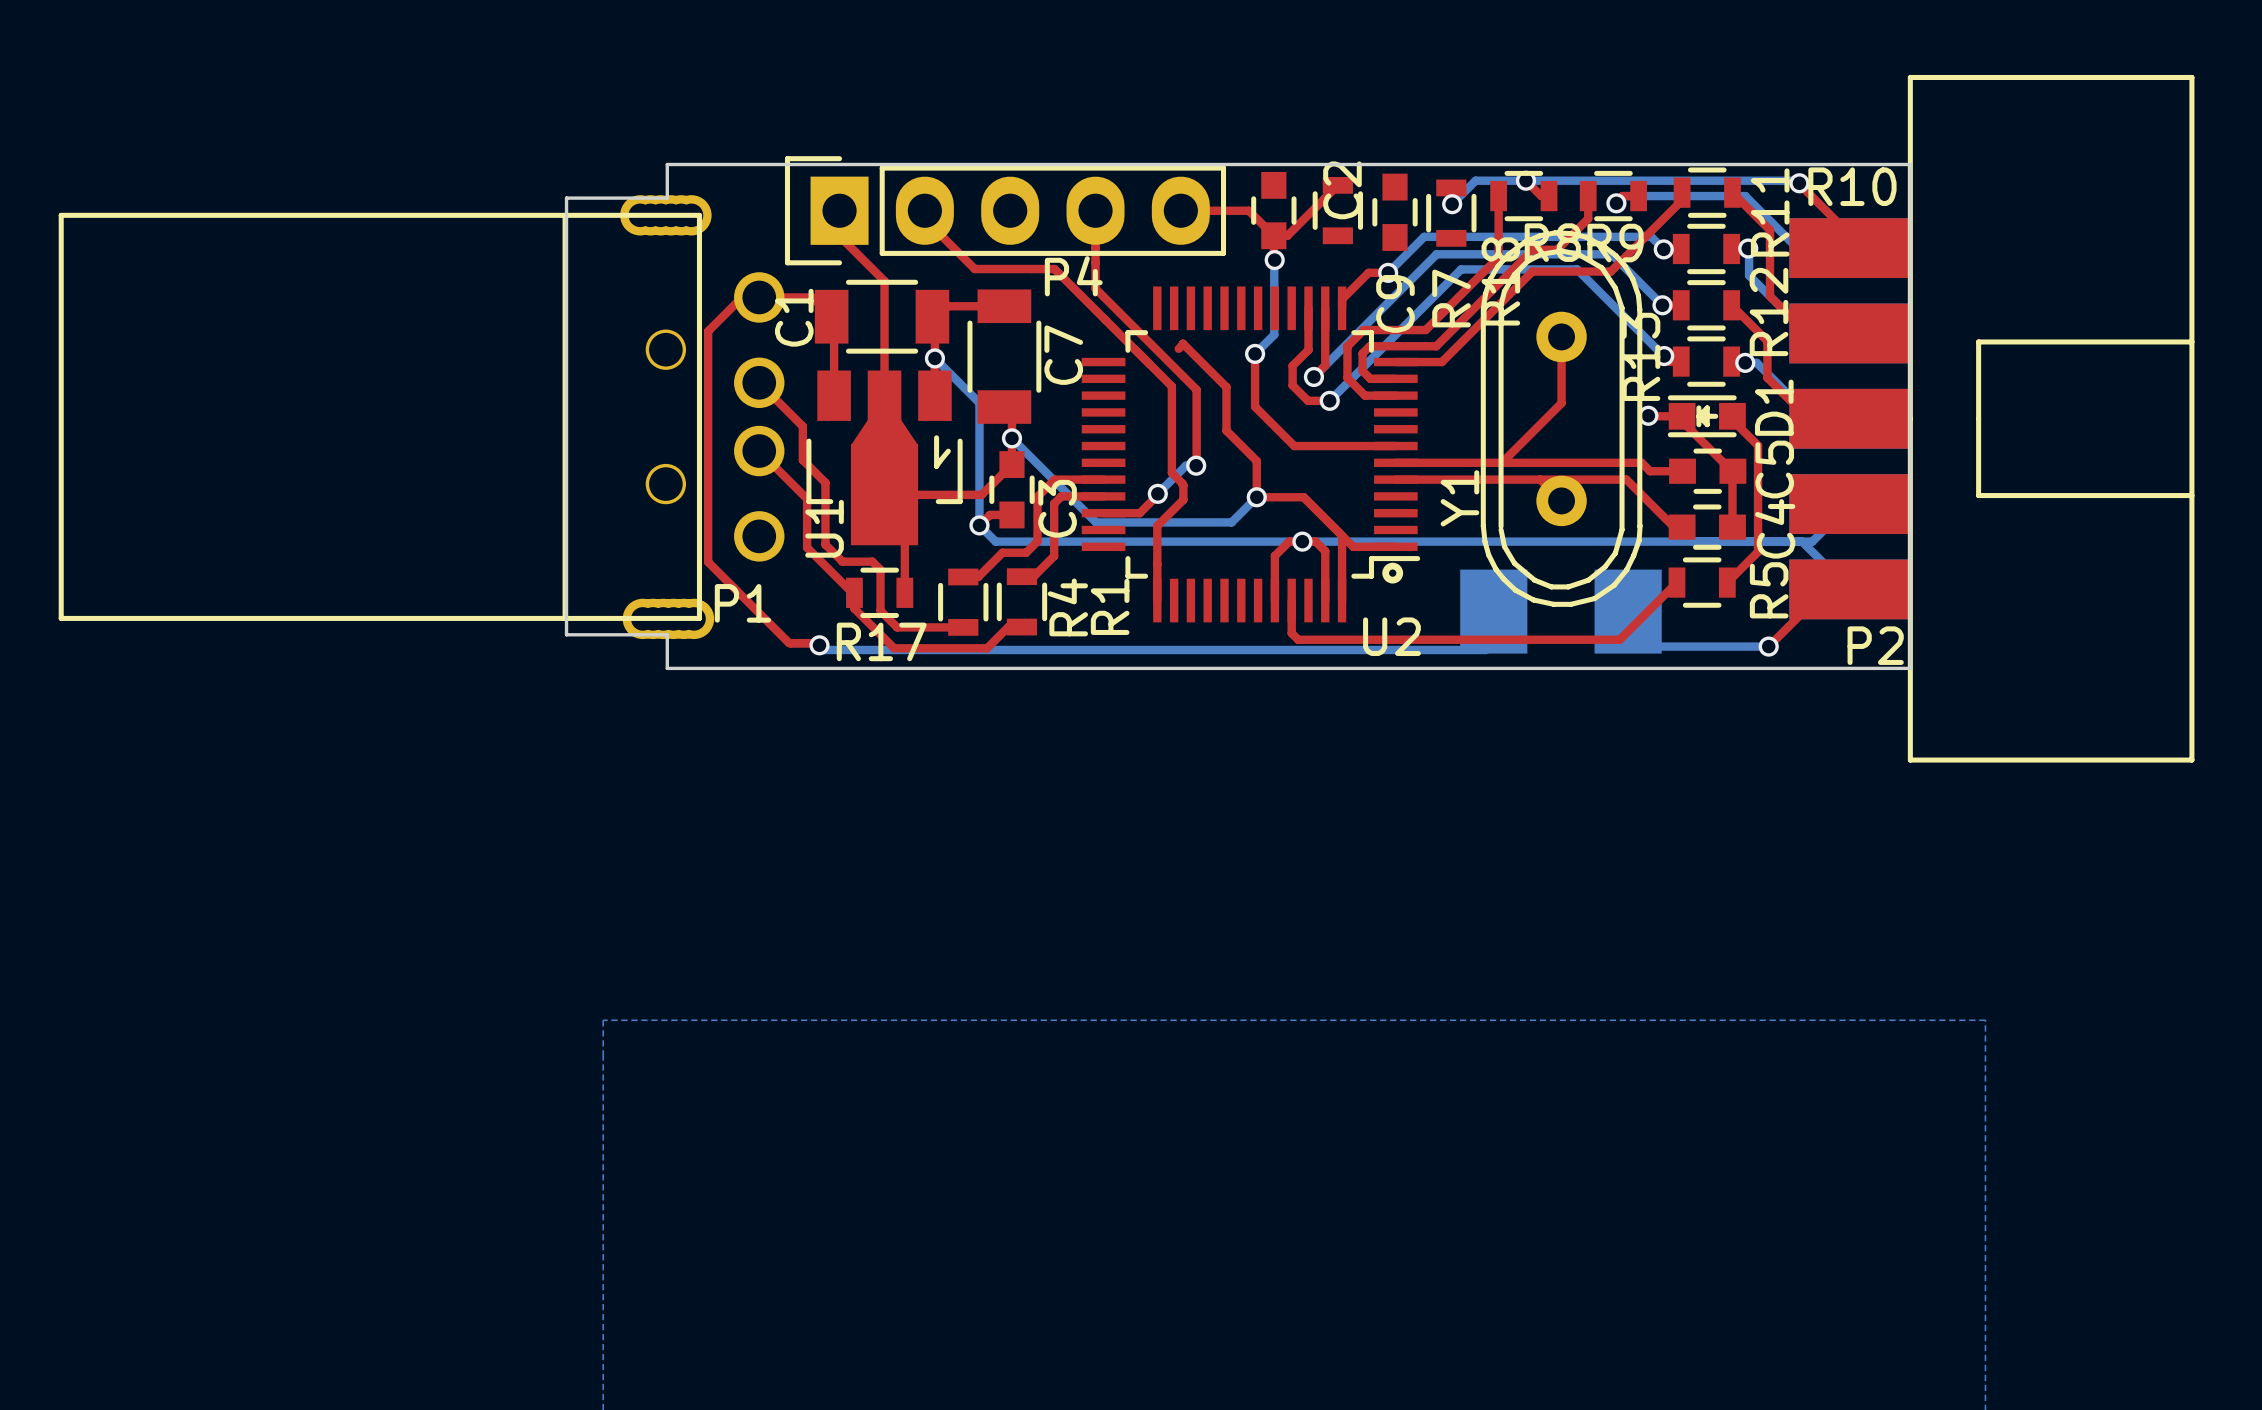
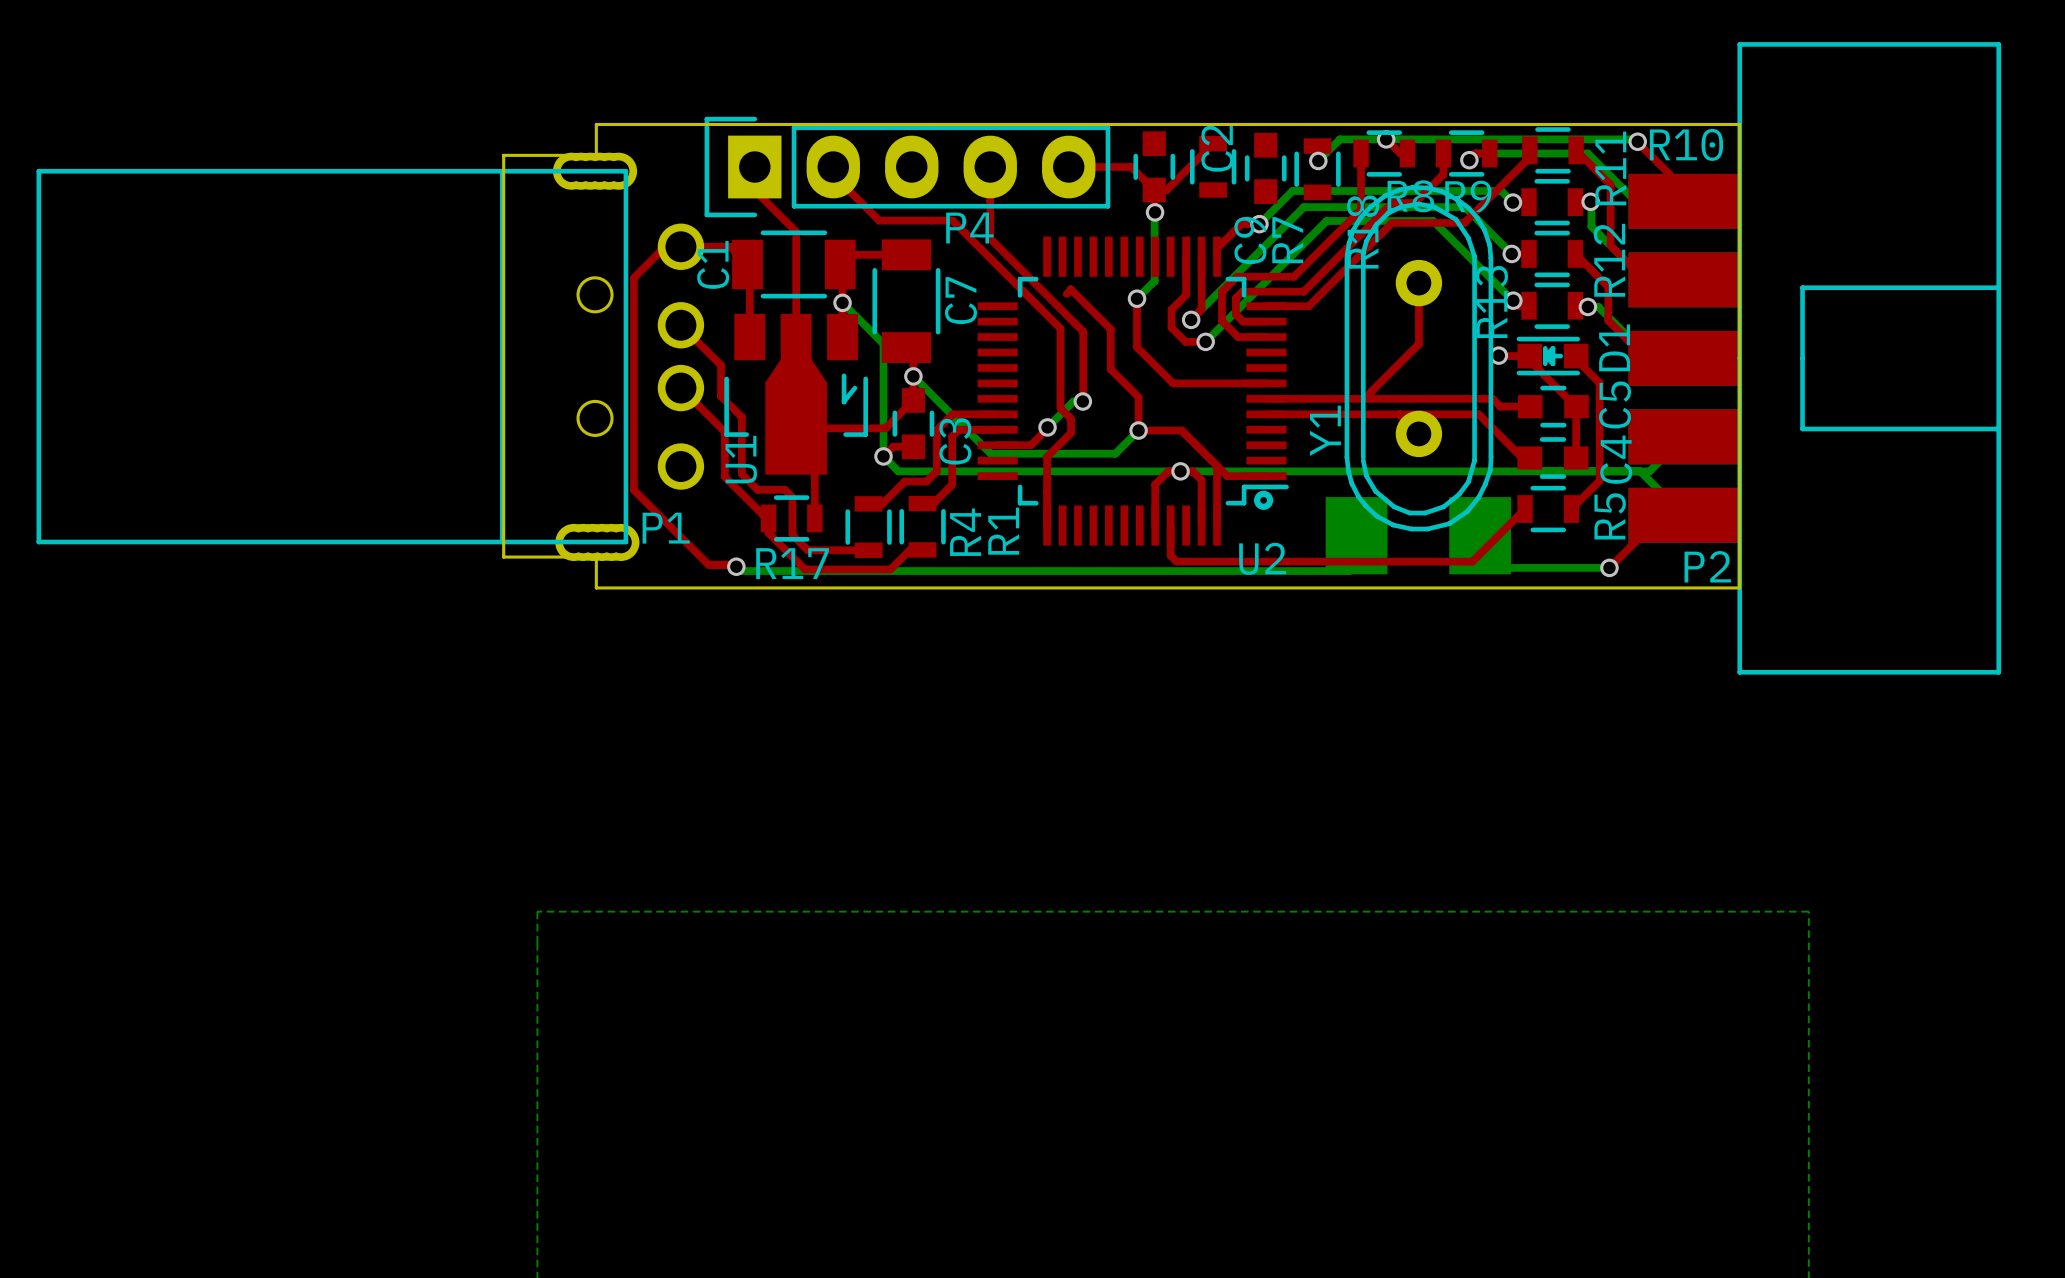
R7 name position: R7 (1451, 298) -> R7 (1287, 240)
C9 name position: C9 (1395, 303) -> C9 (1250, 240)

